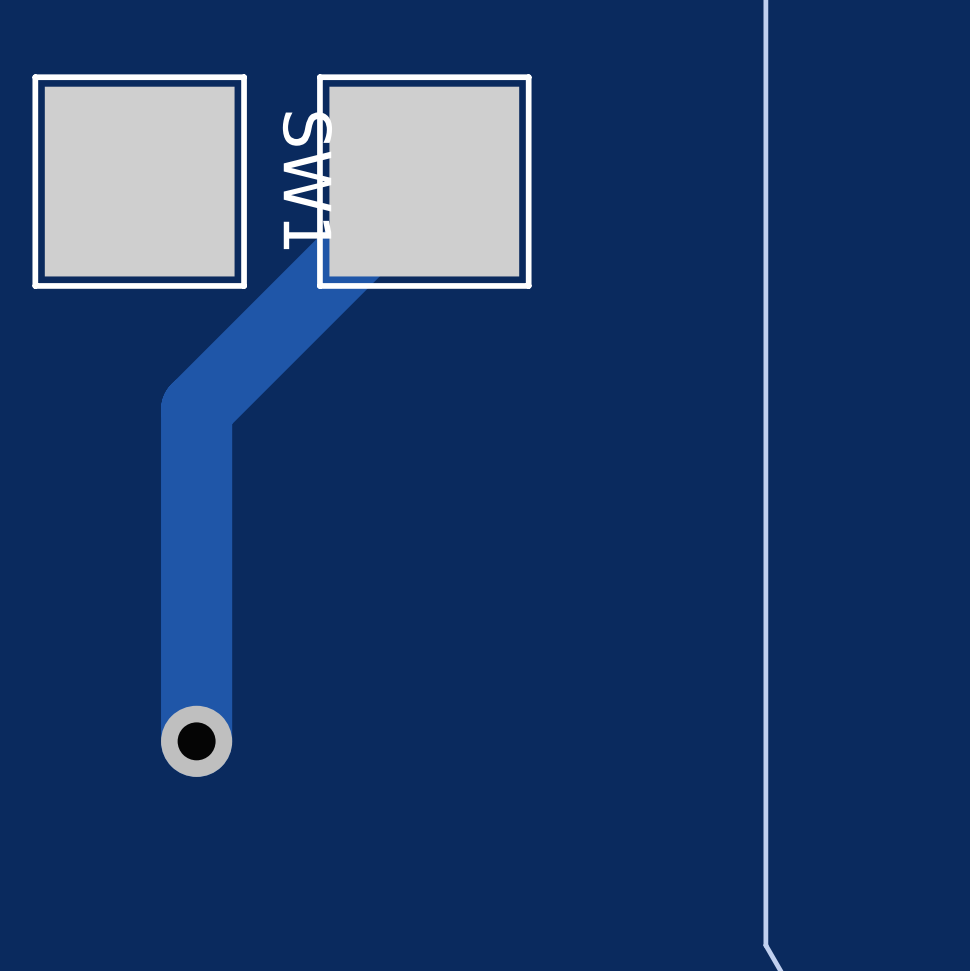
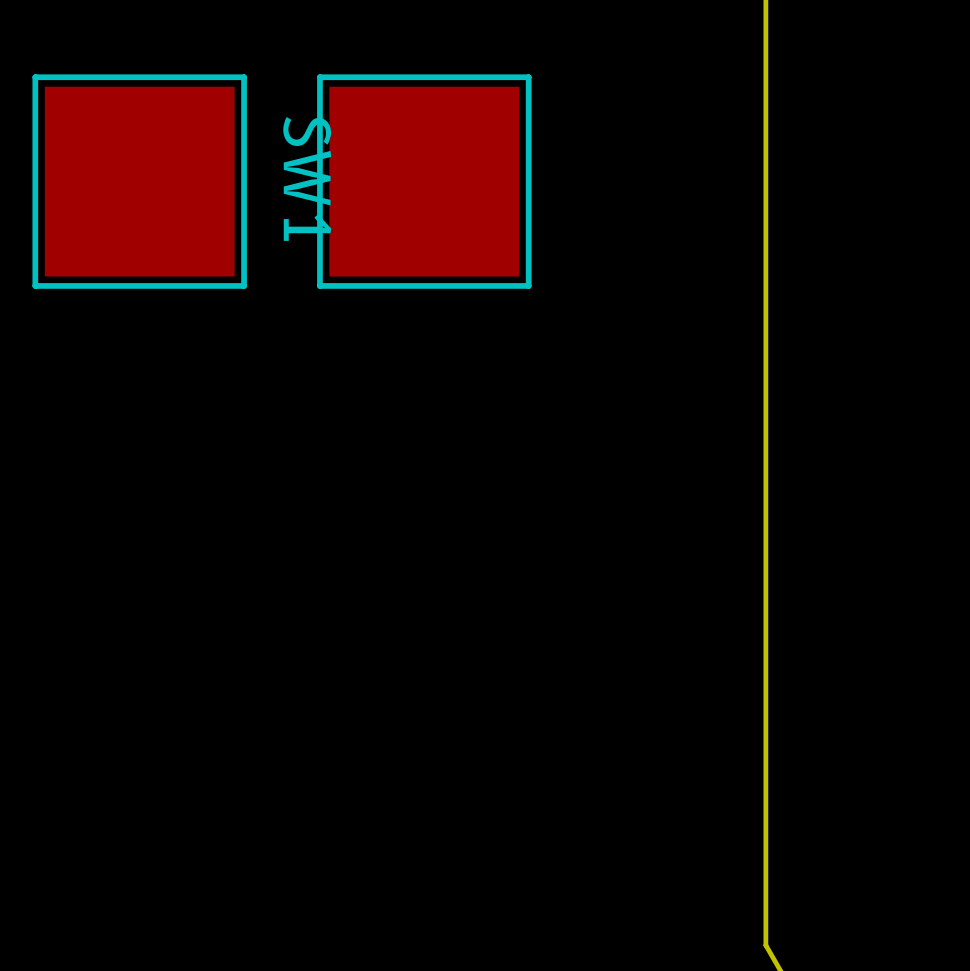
track: (424, 181) (196, 409) (196, 741) -> none
via: (196, 741) -> none

